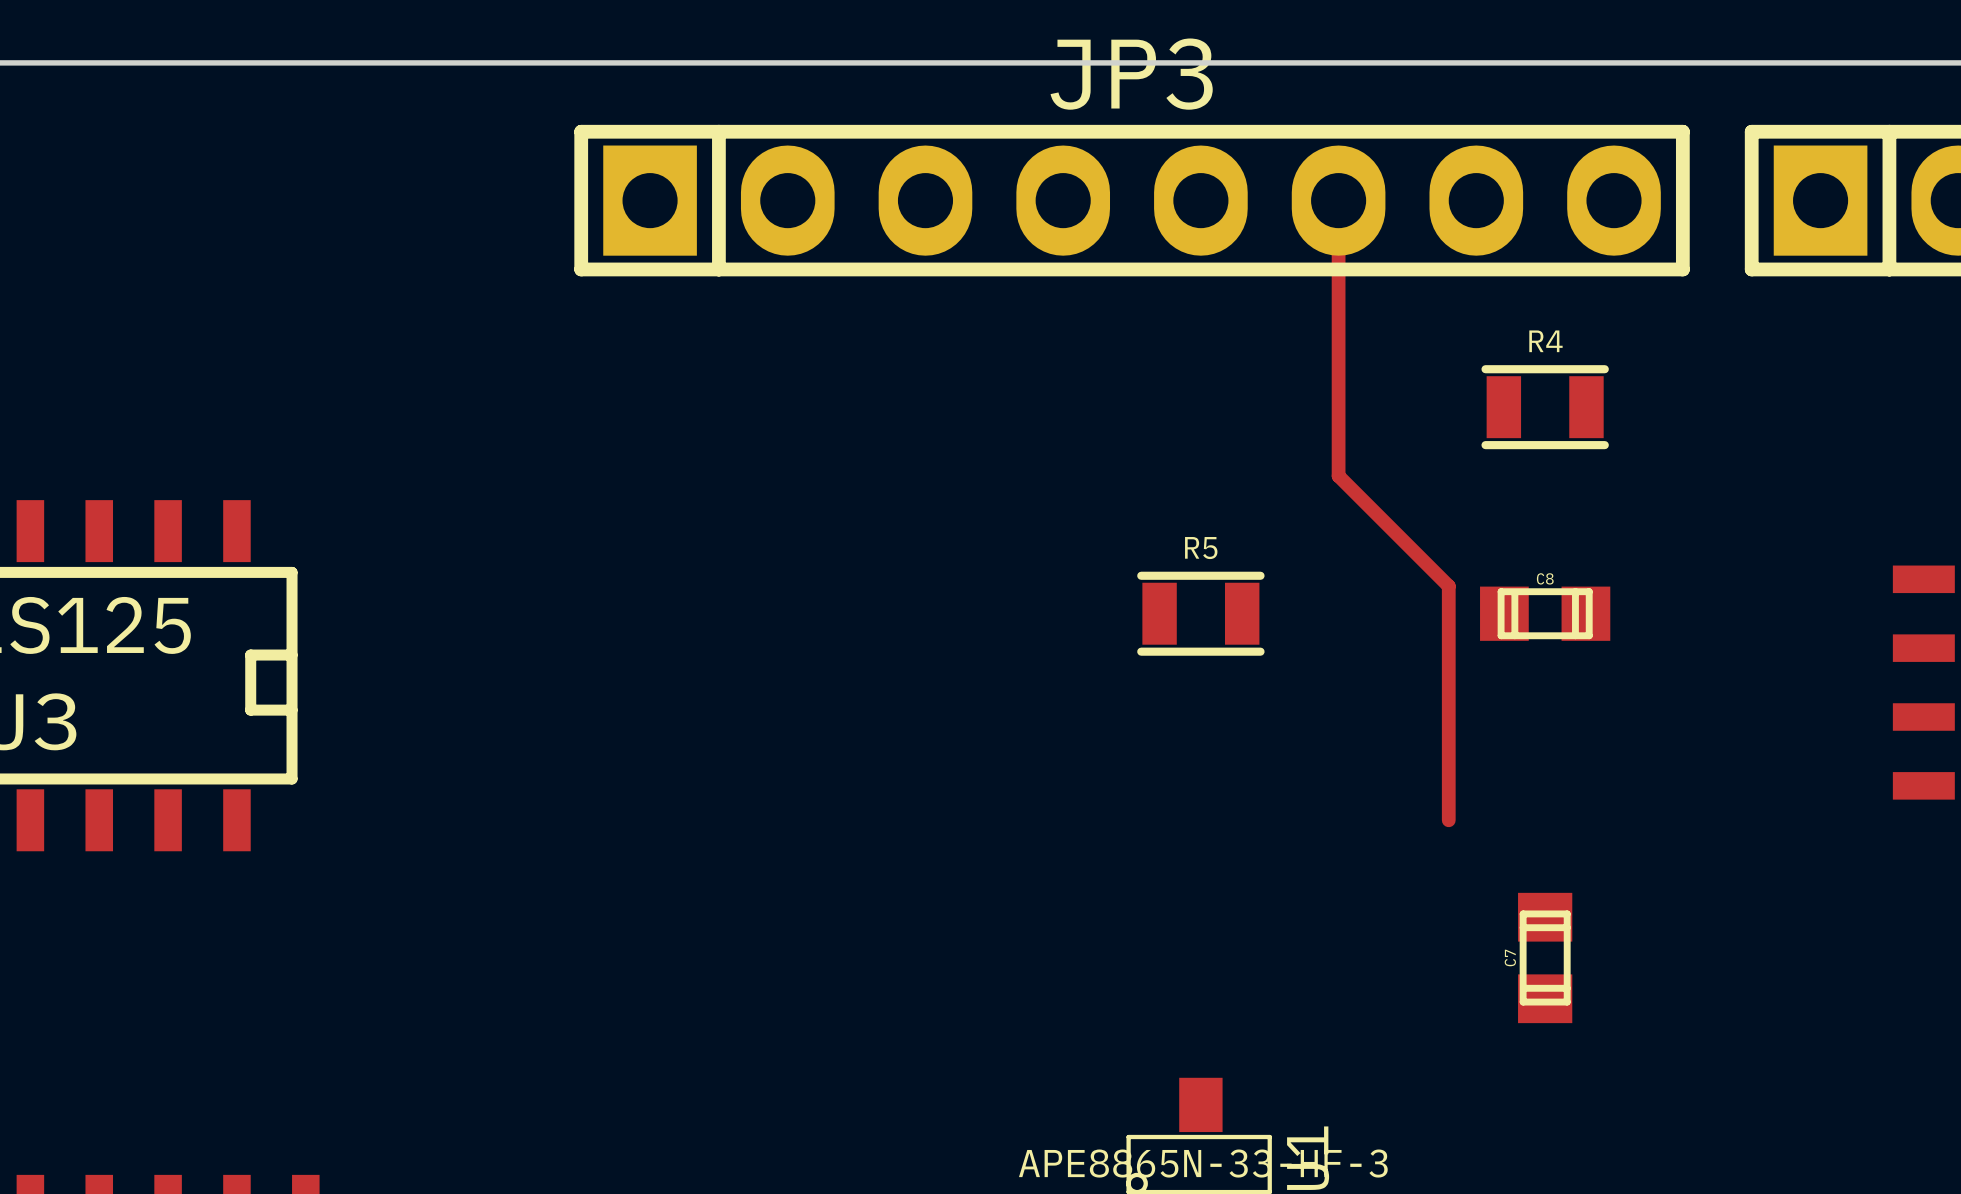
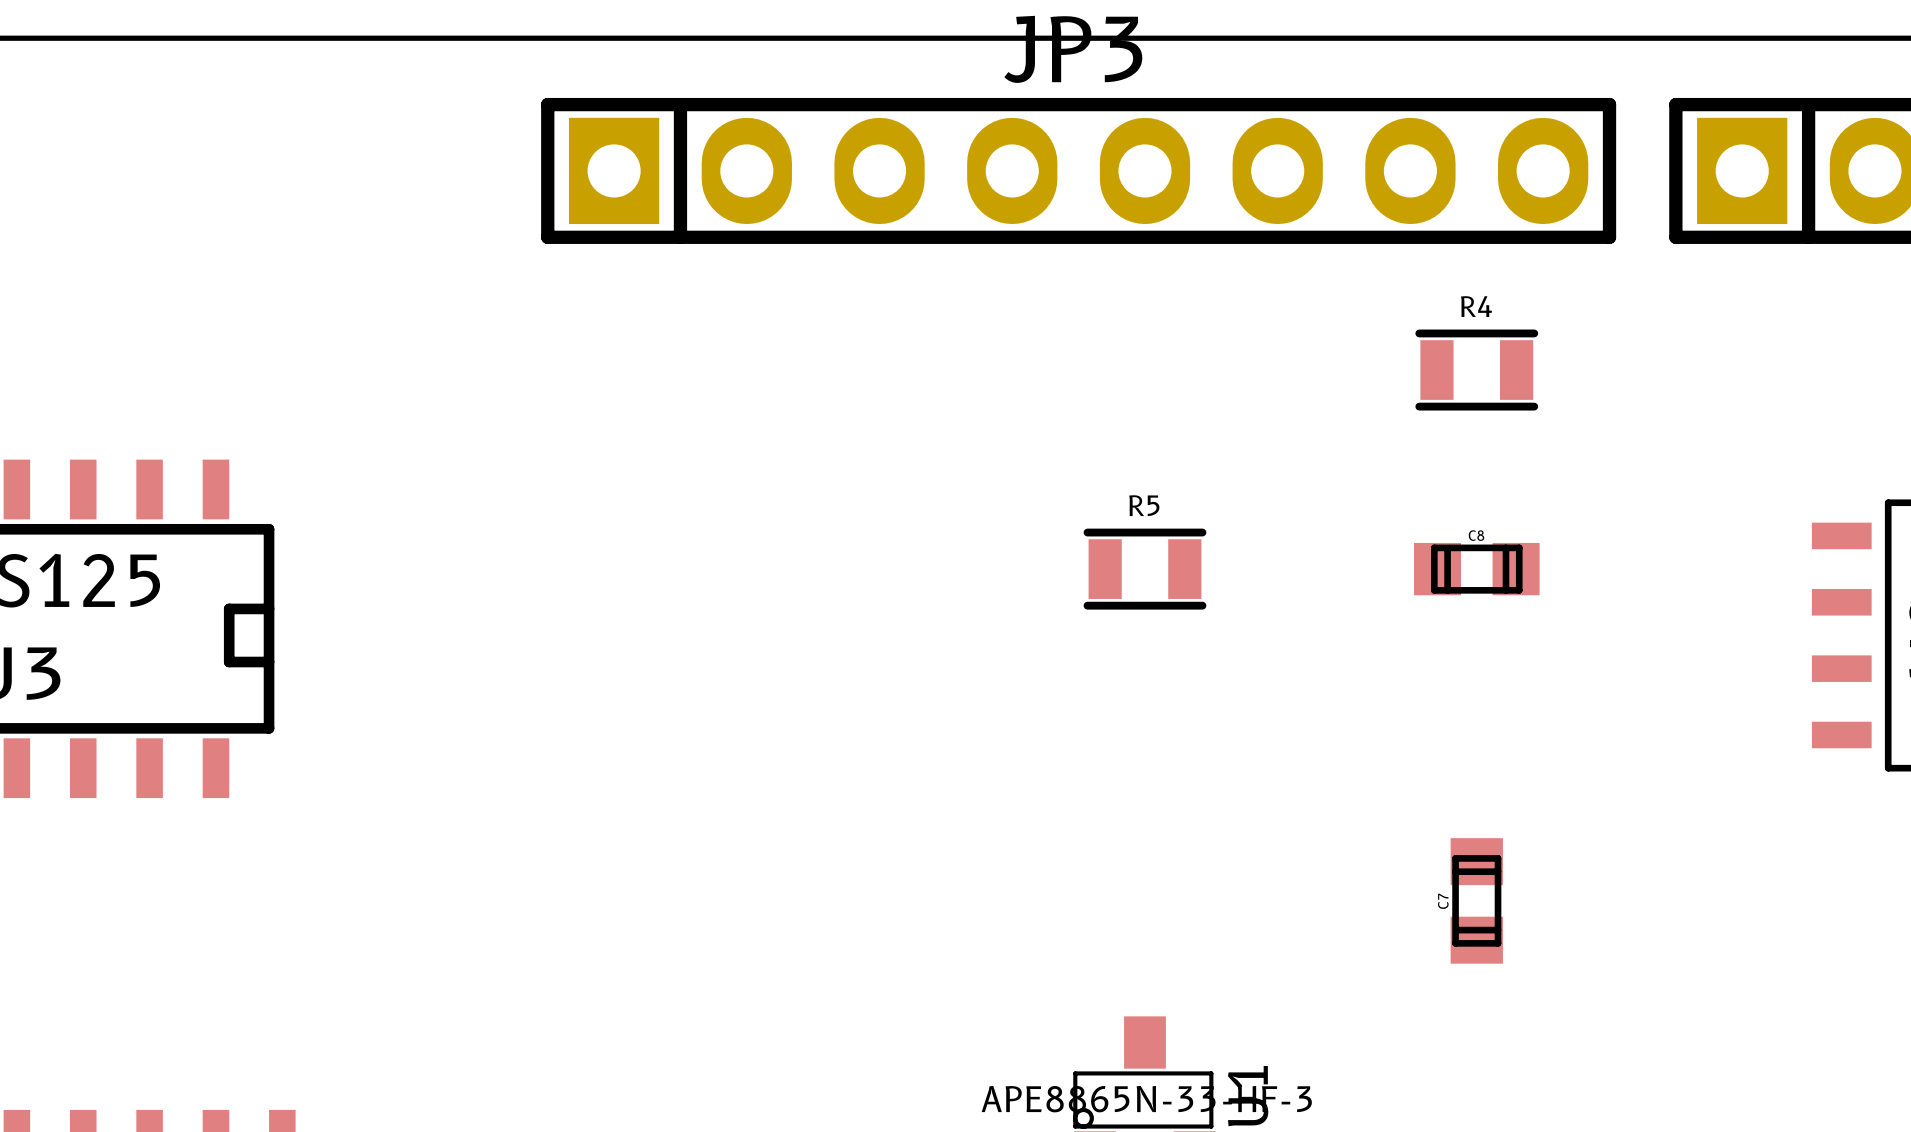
track: (1338, 200) (1338, 476) (1448, 586) (1448, 820) -> none

